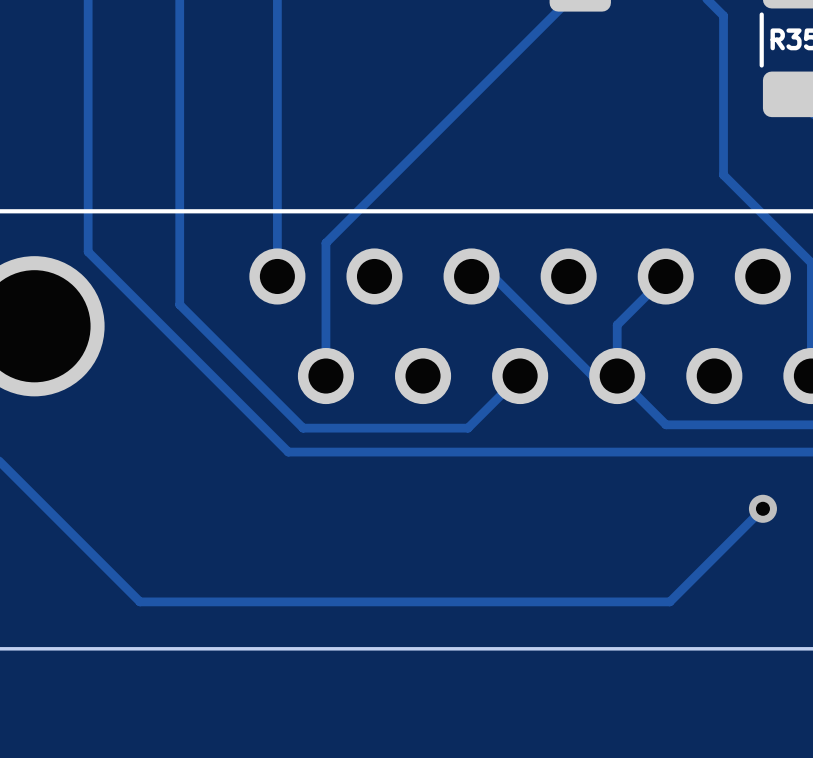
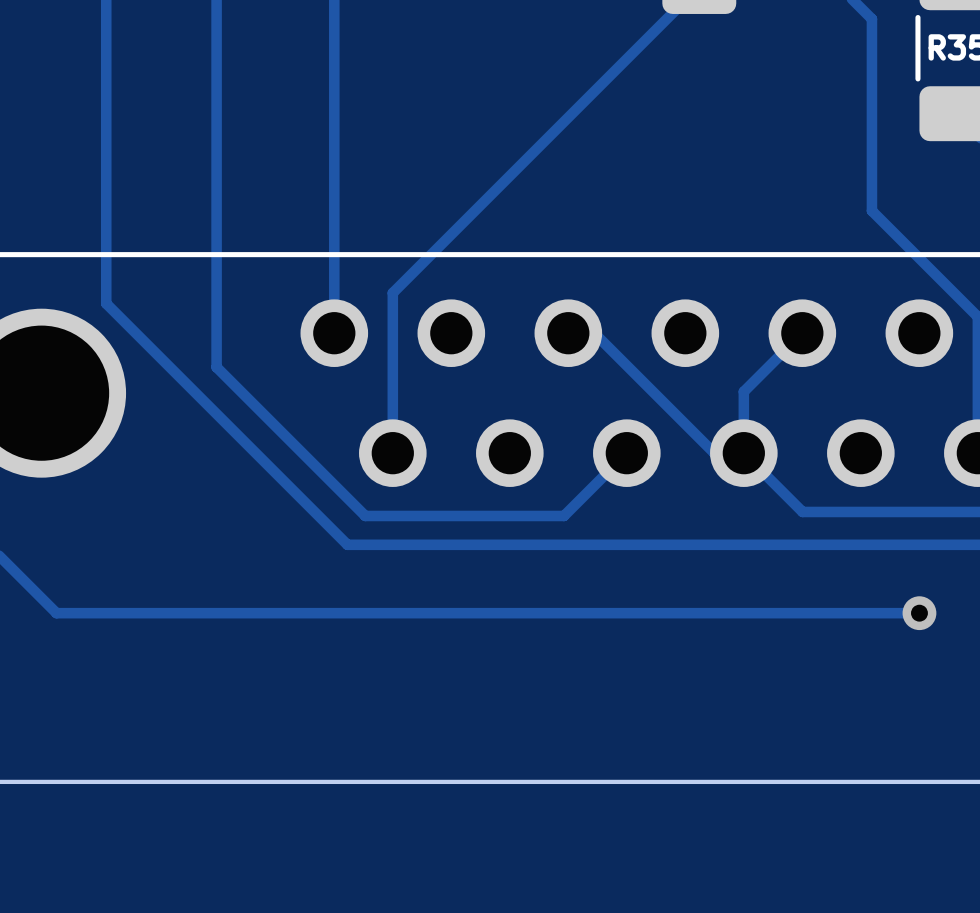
track: (46, 508) (140, 601) (669, 601) (762, 508) -> (56, 613) (919, 613)

